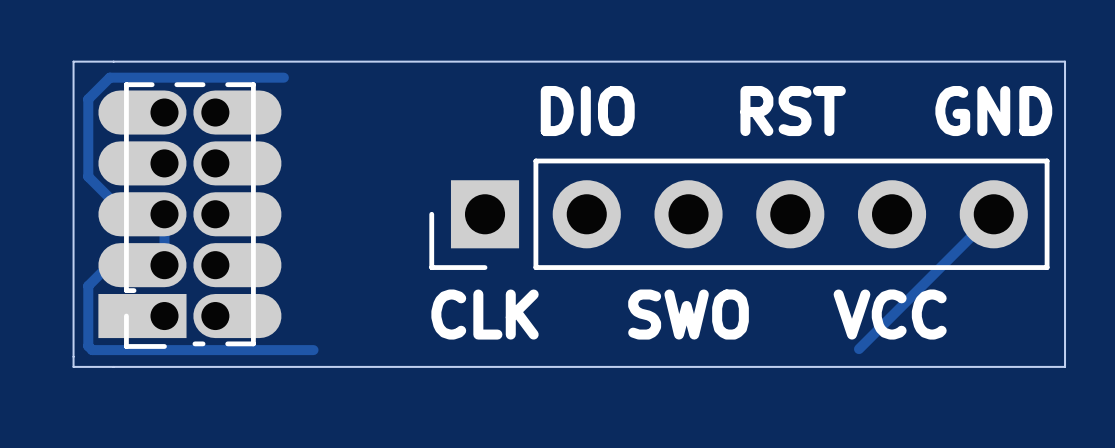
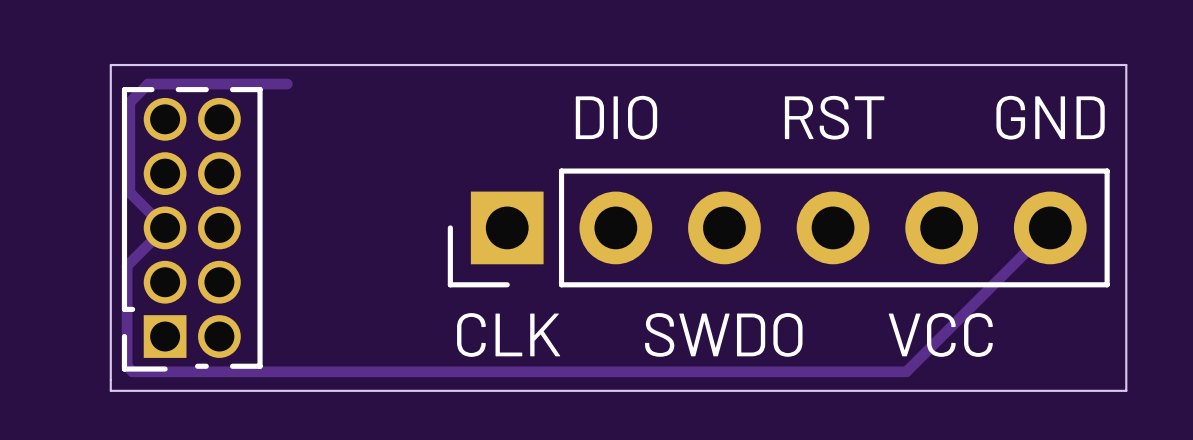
board edge: (113, 61) (73, 61) (73, 366) (113, 366) -> (110, 65) (110, 390)
track: (283, 77) (109, 77) (88, 99) (88, 176) (125, 214) (164, 214) (164, 265) (109, 265) (88, 285) (88, 346) (92, 350) (313, 350) -> none
track: none -> (287, 84) (148, 84) (129, 102) (129, 192) (165, 227) (127, 265) (127, 366) (132, 371) (906, 371)
part footprint: [98, 82, 282, 349] -> [121, 87, 263, 372]
text: SWO (688, 314) -> SWDO (723, 334)

